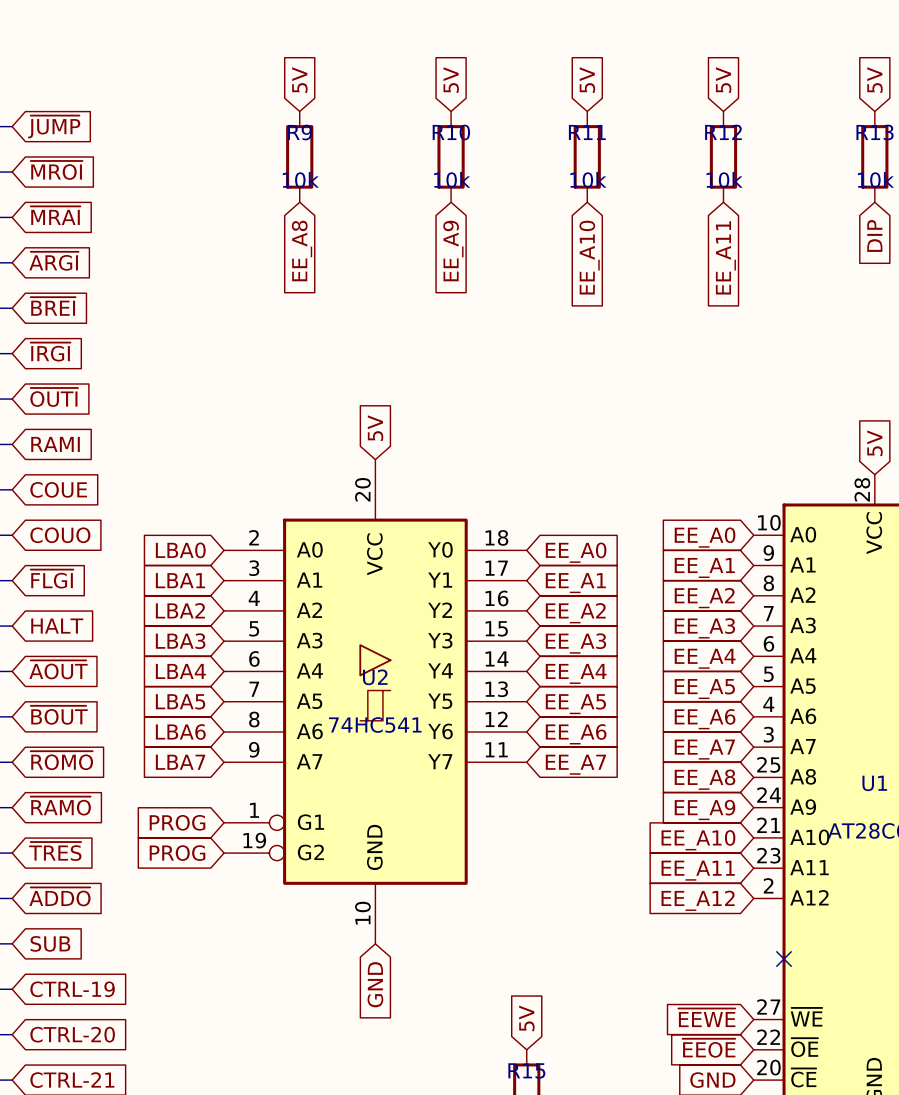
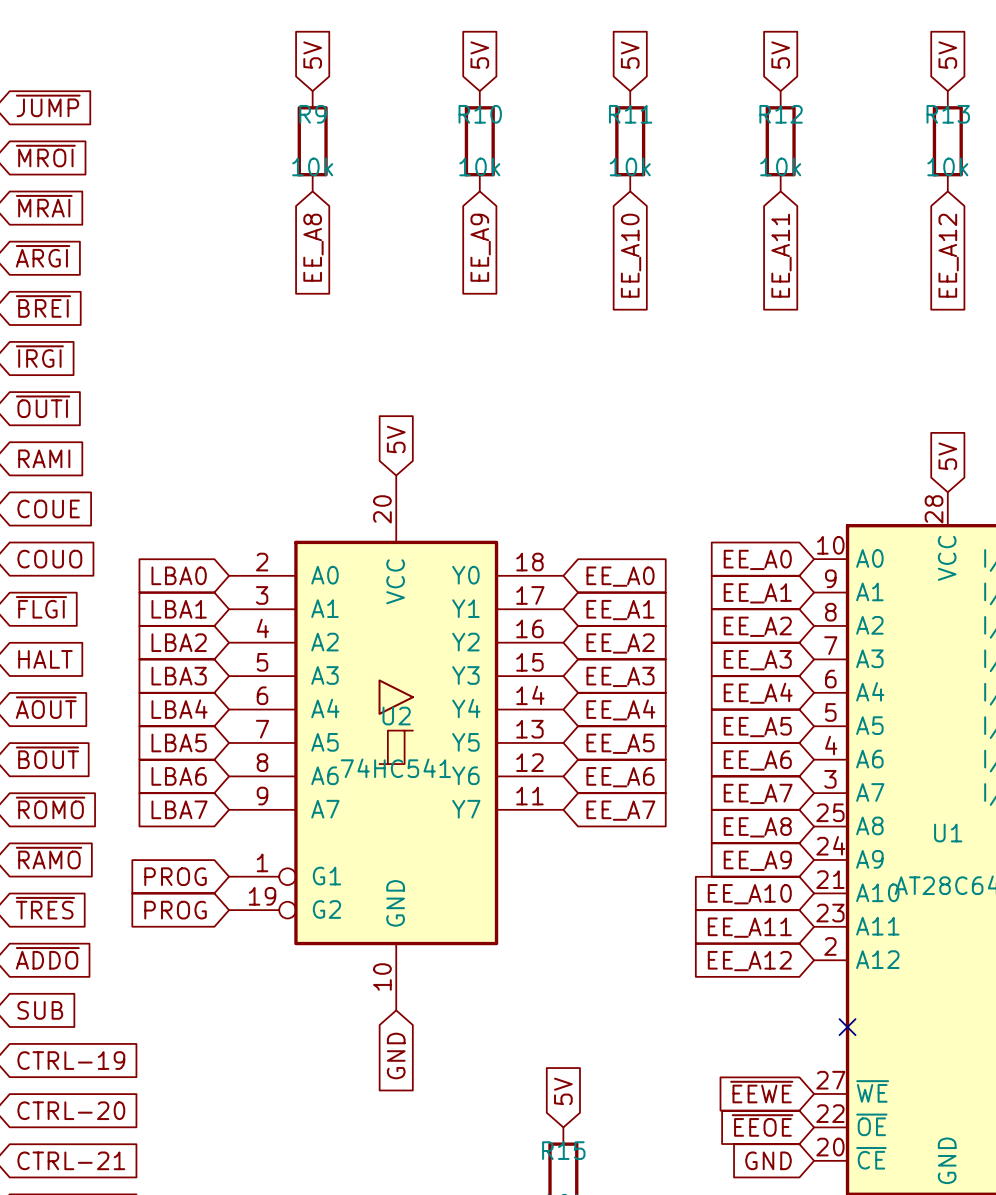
global label: DIP (874, 235) -> EE_A12 (948, 255)

